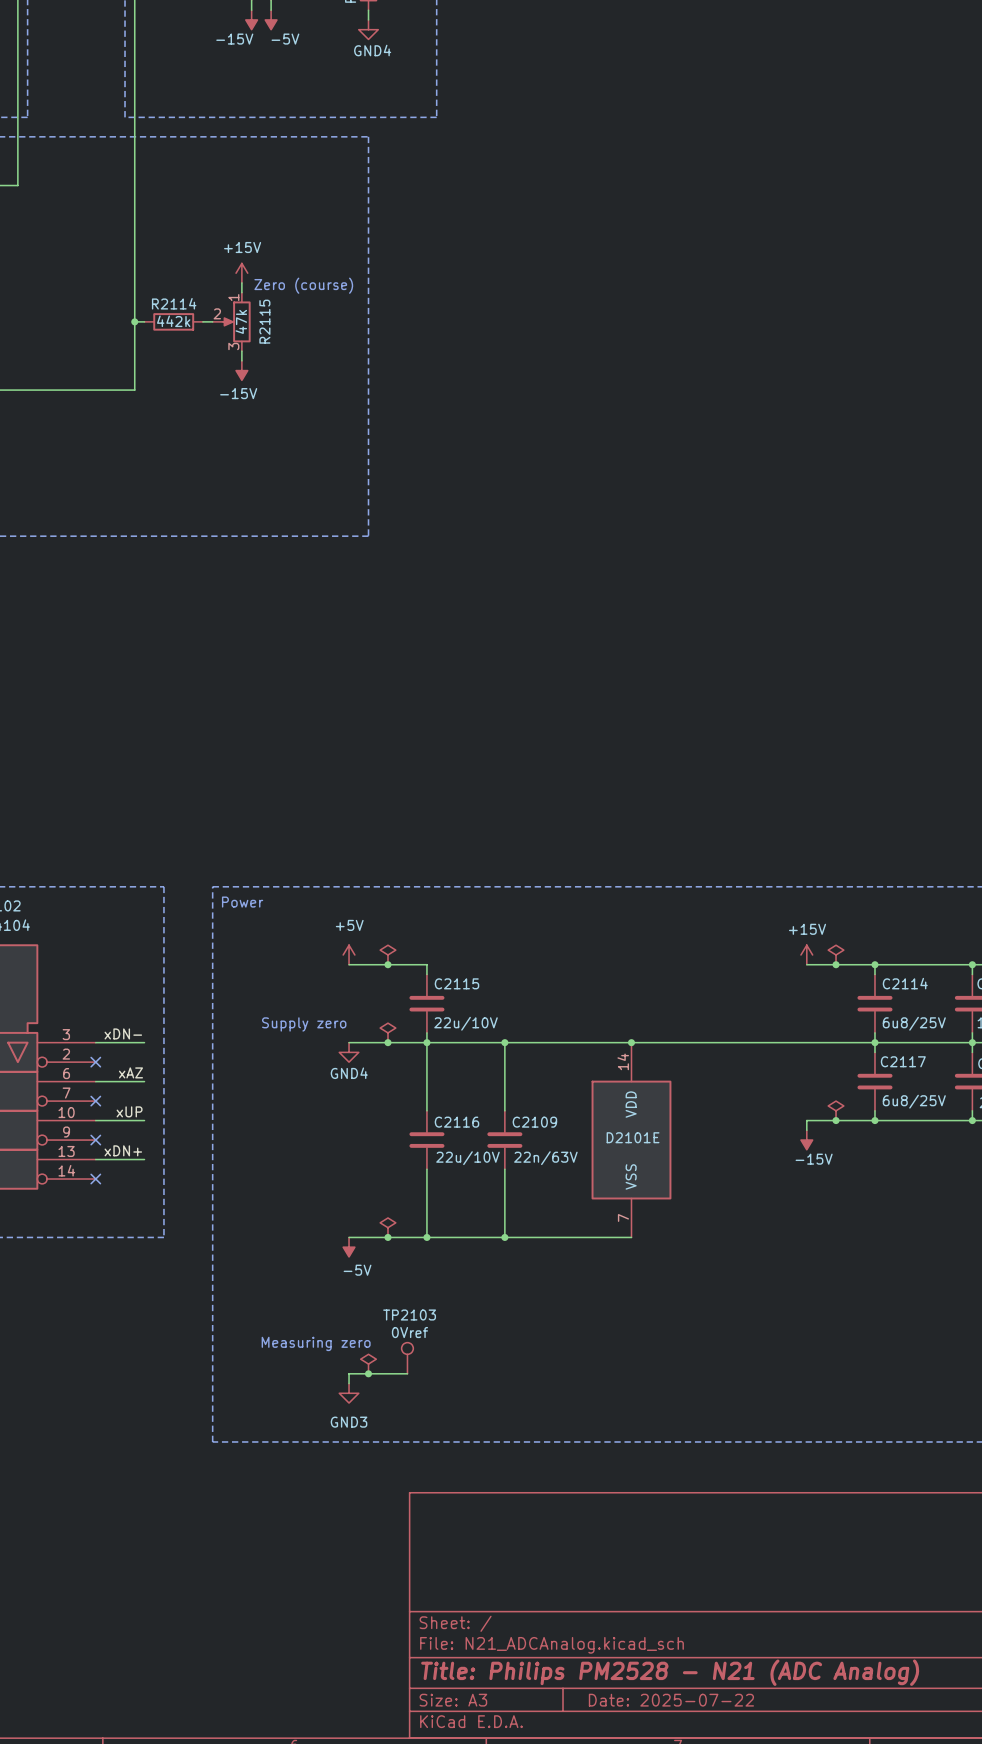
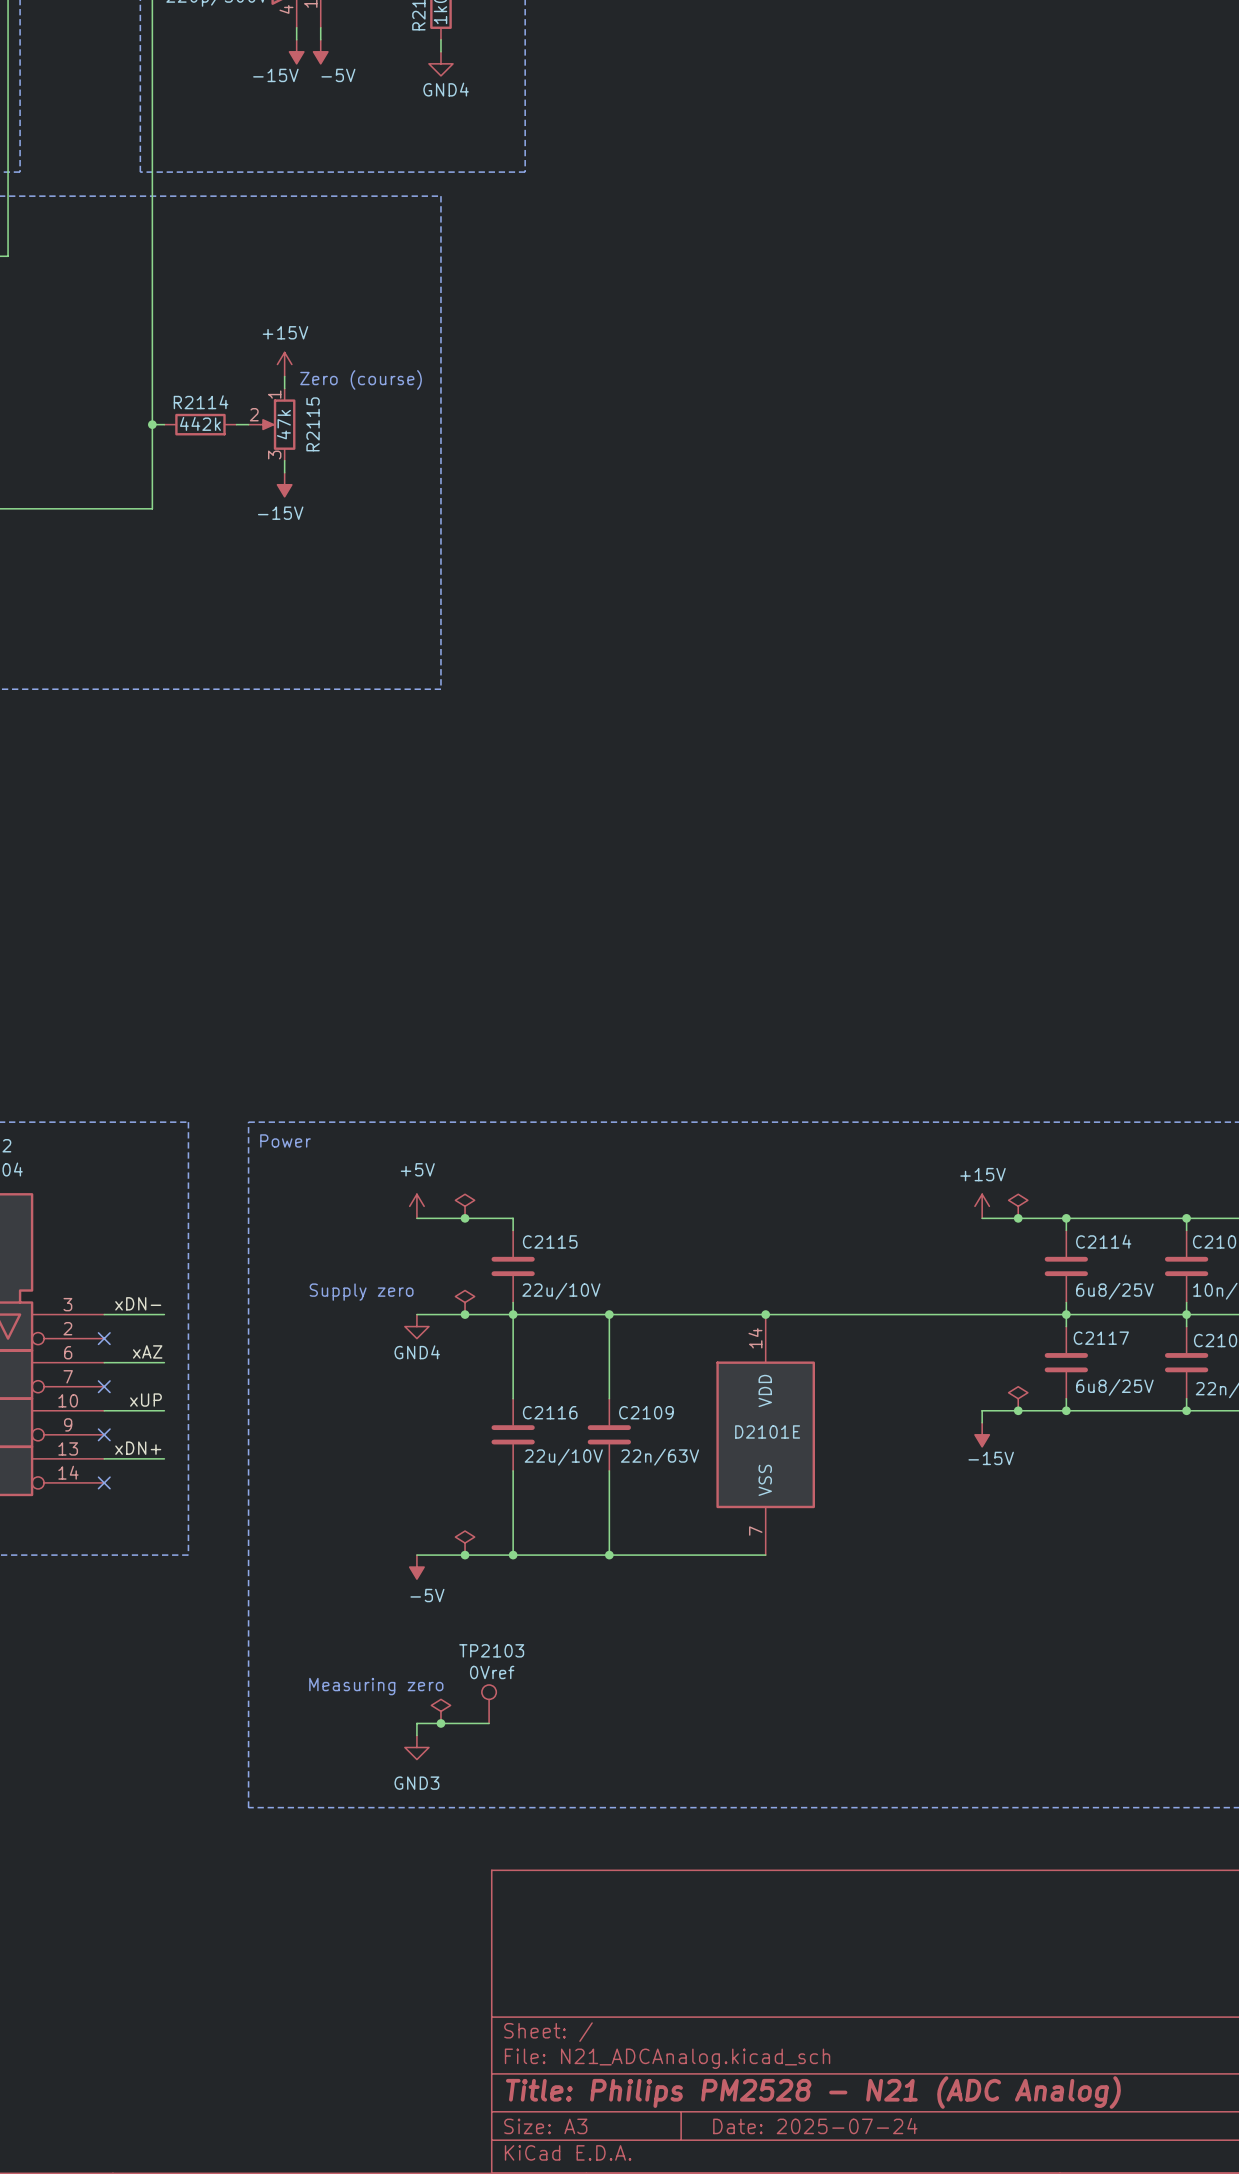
title block: Date: 2025-07-22 (671, 1700) -> Date: 2025-07-24 (815, 2126)

